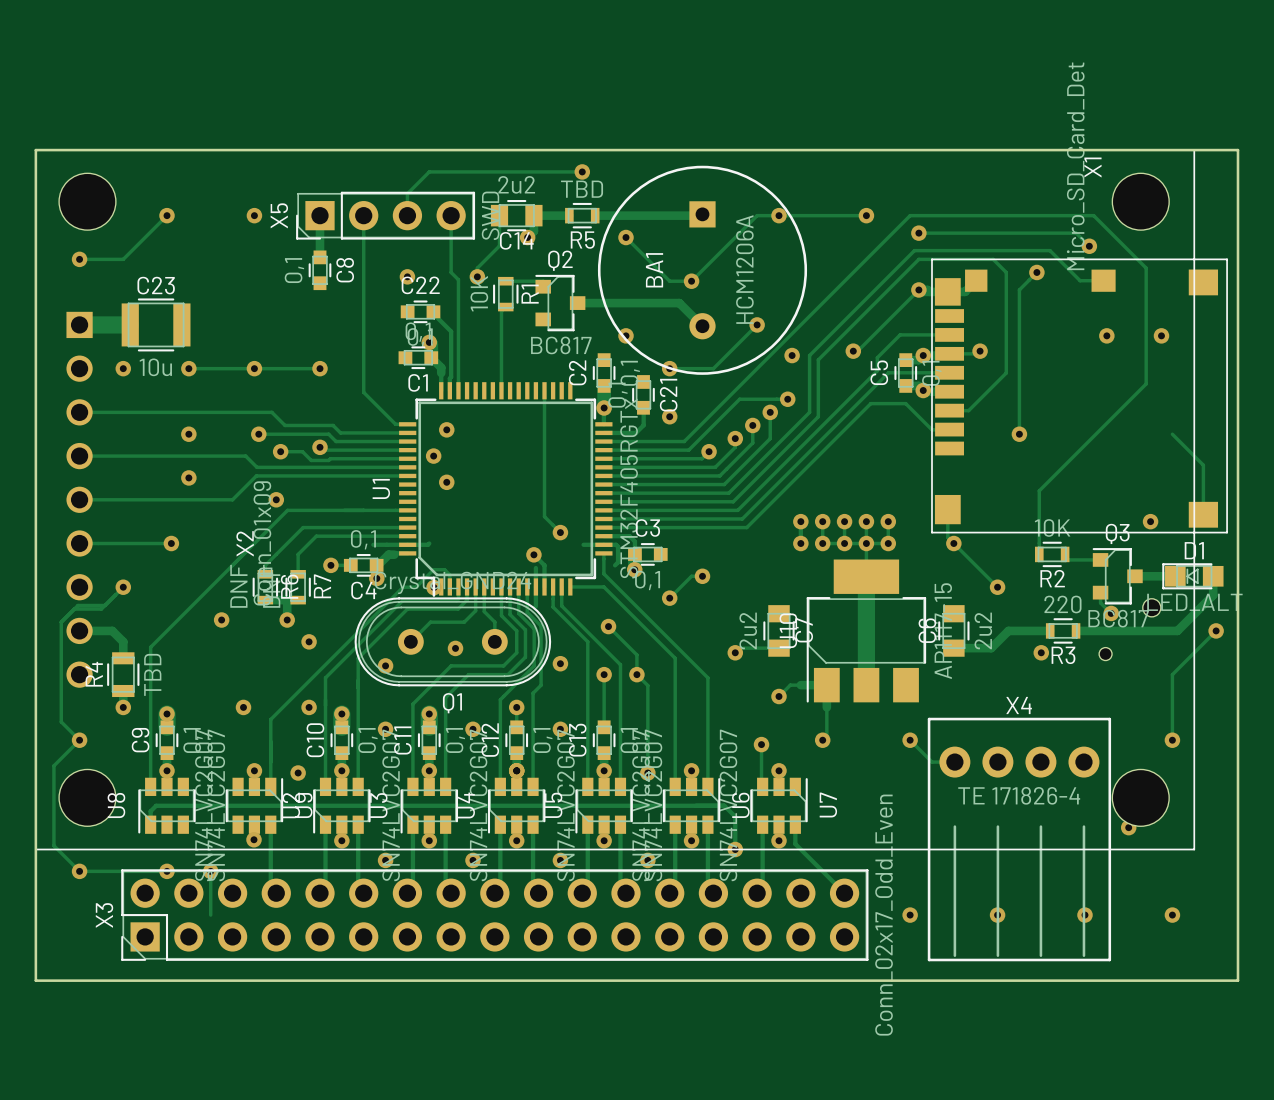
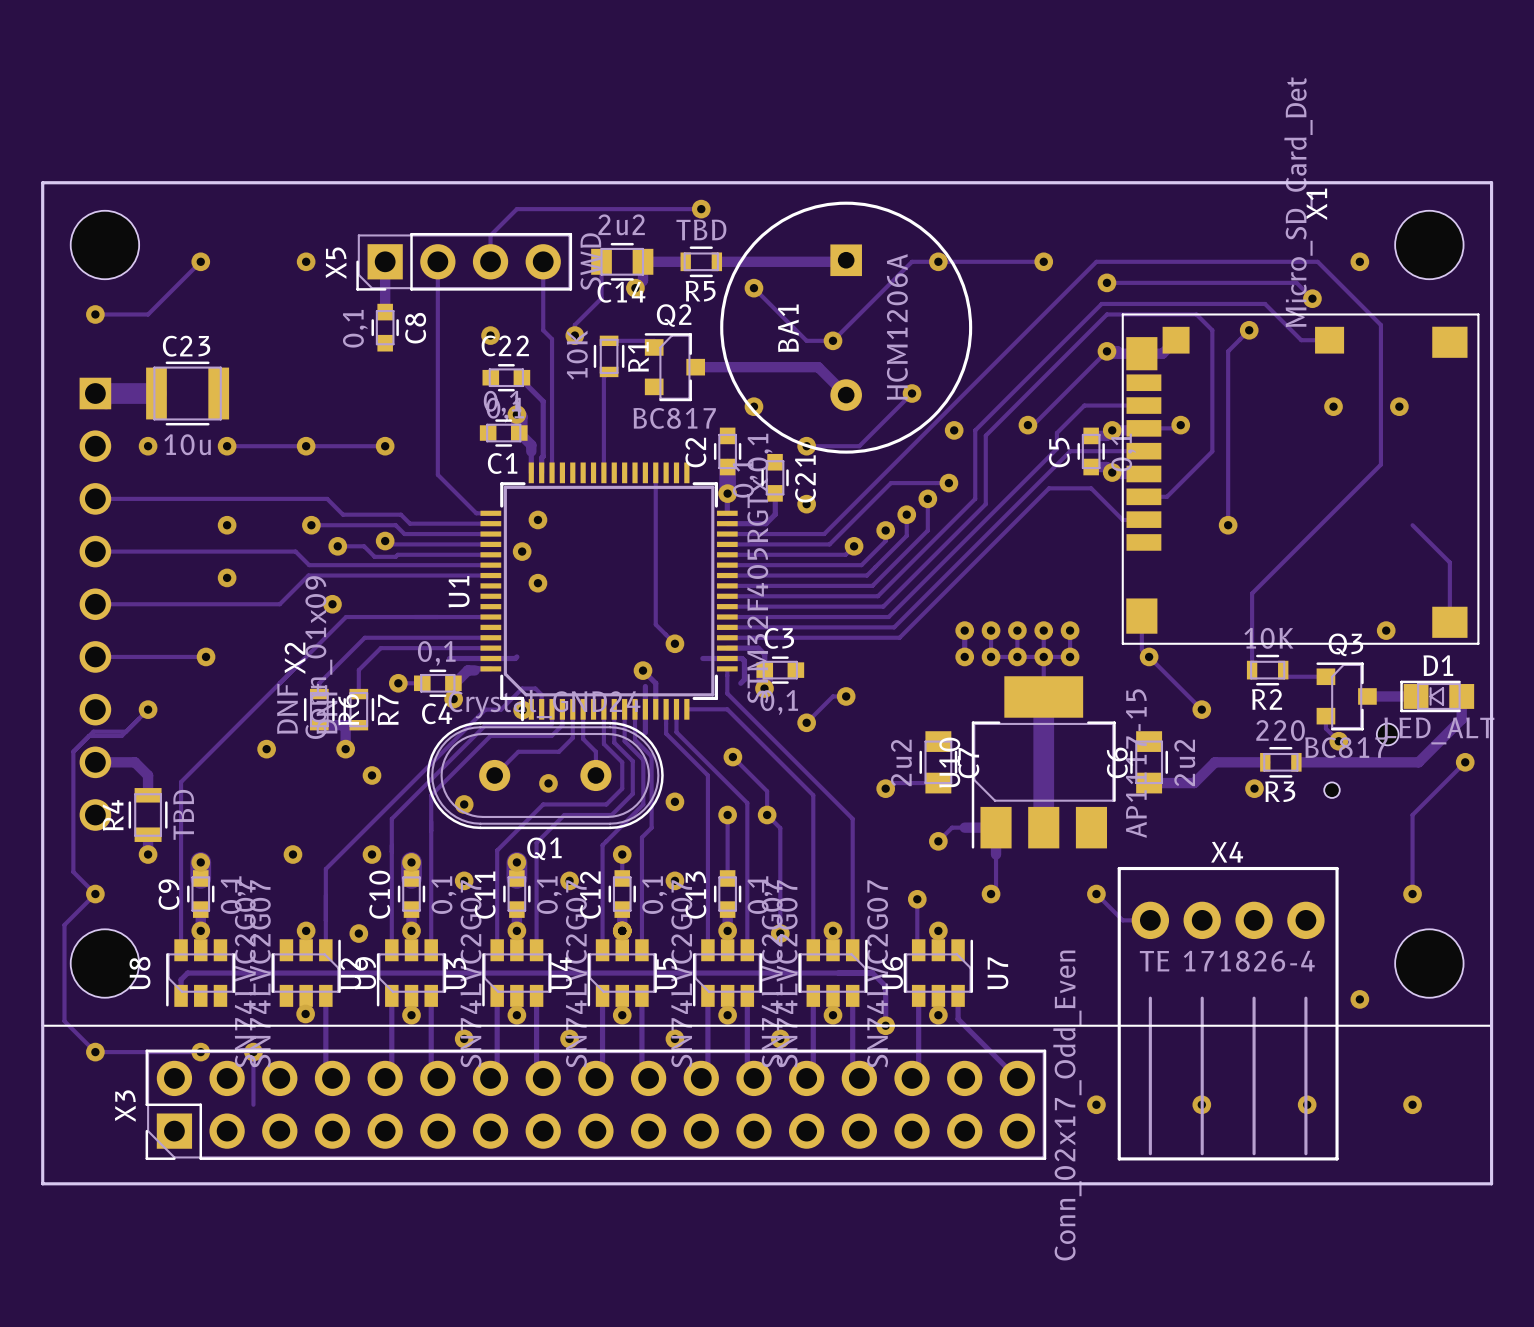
X2 footprint: [35, 149, 1196, 851] -> [41, 181, 1493, 1027]

